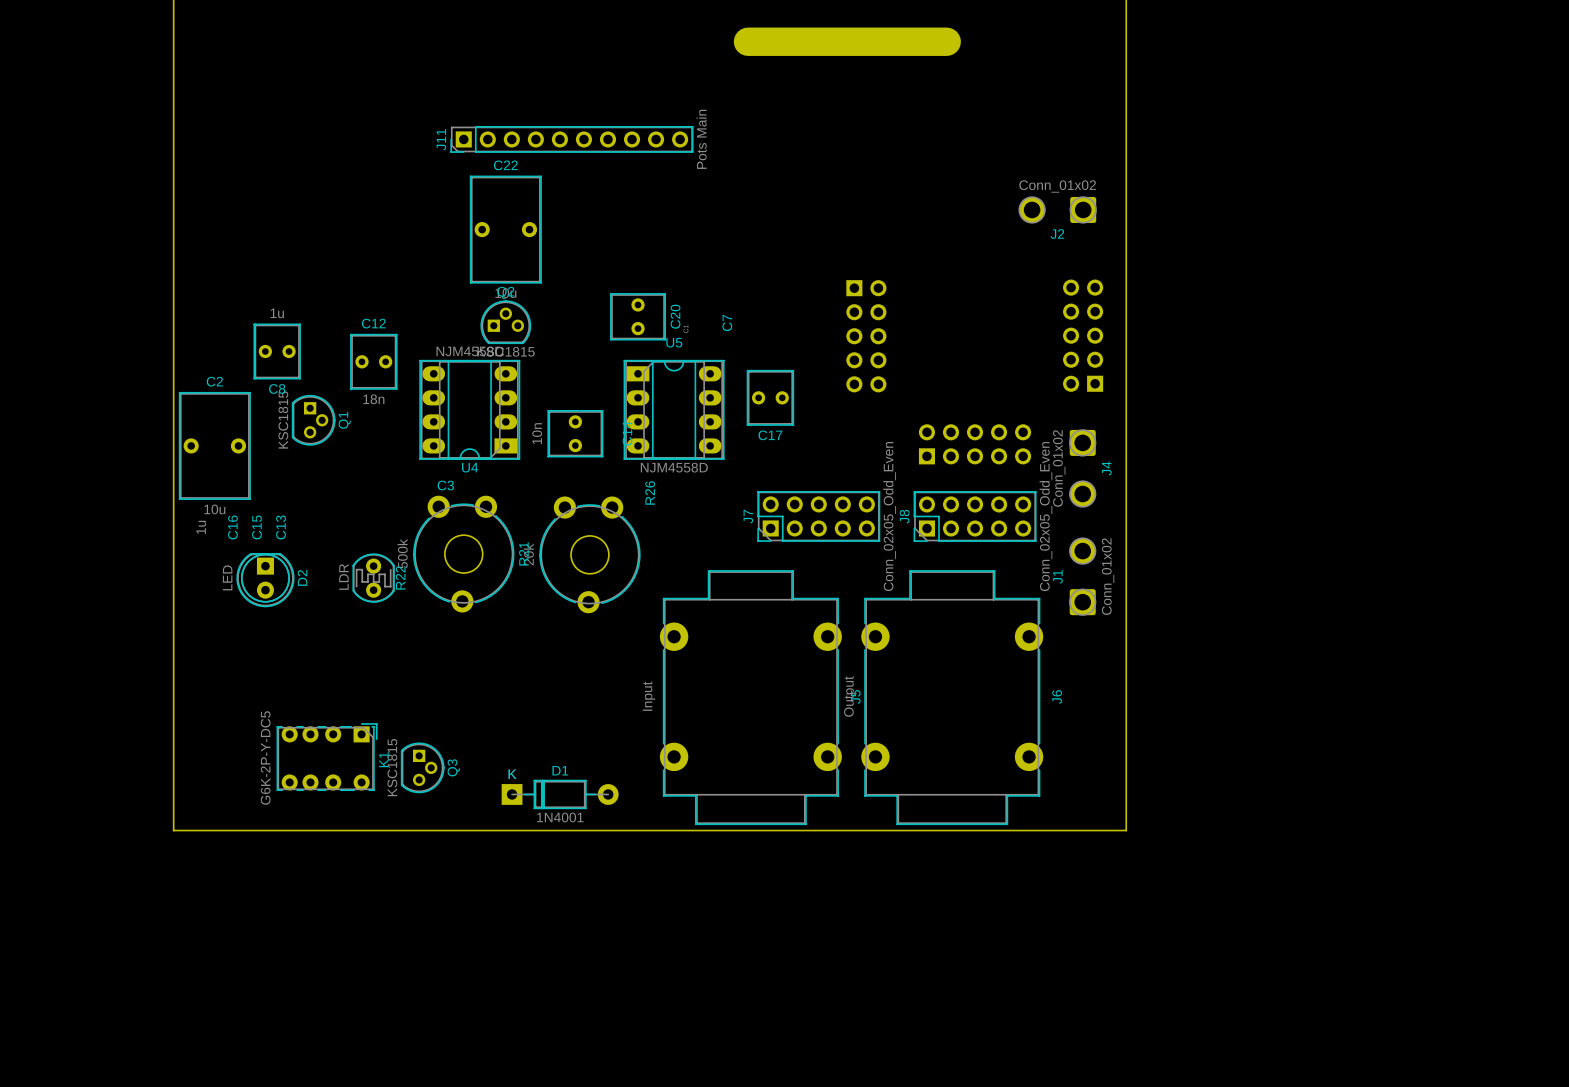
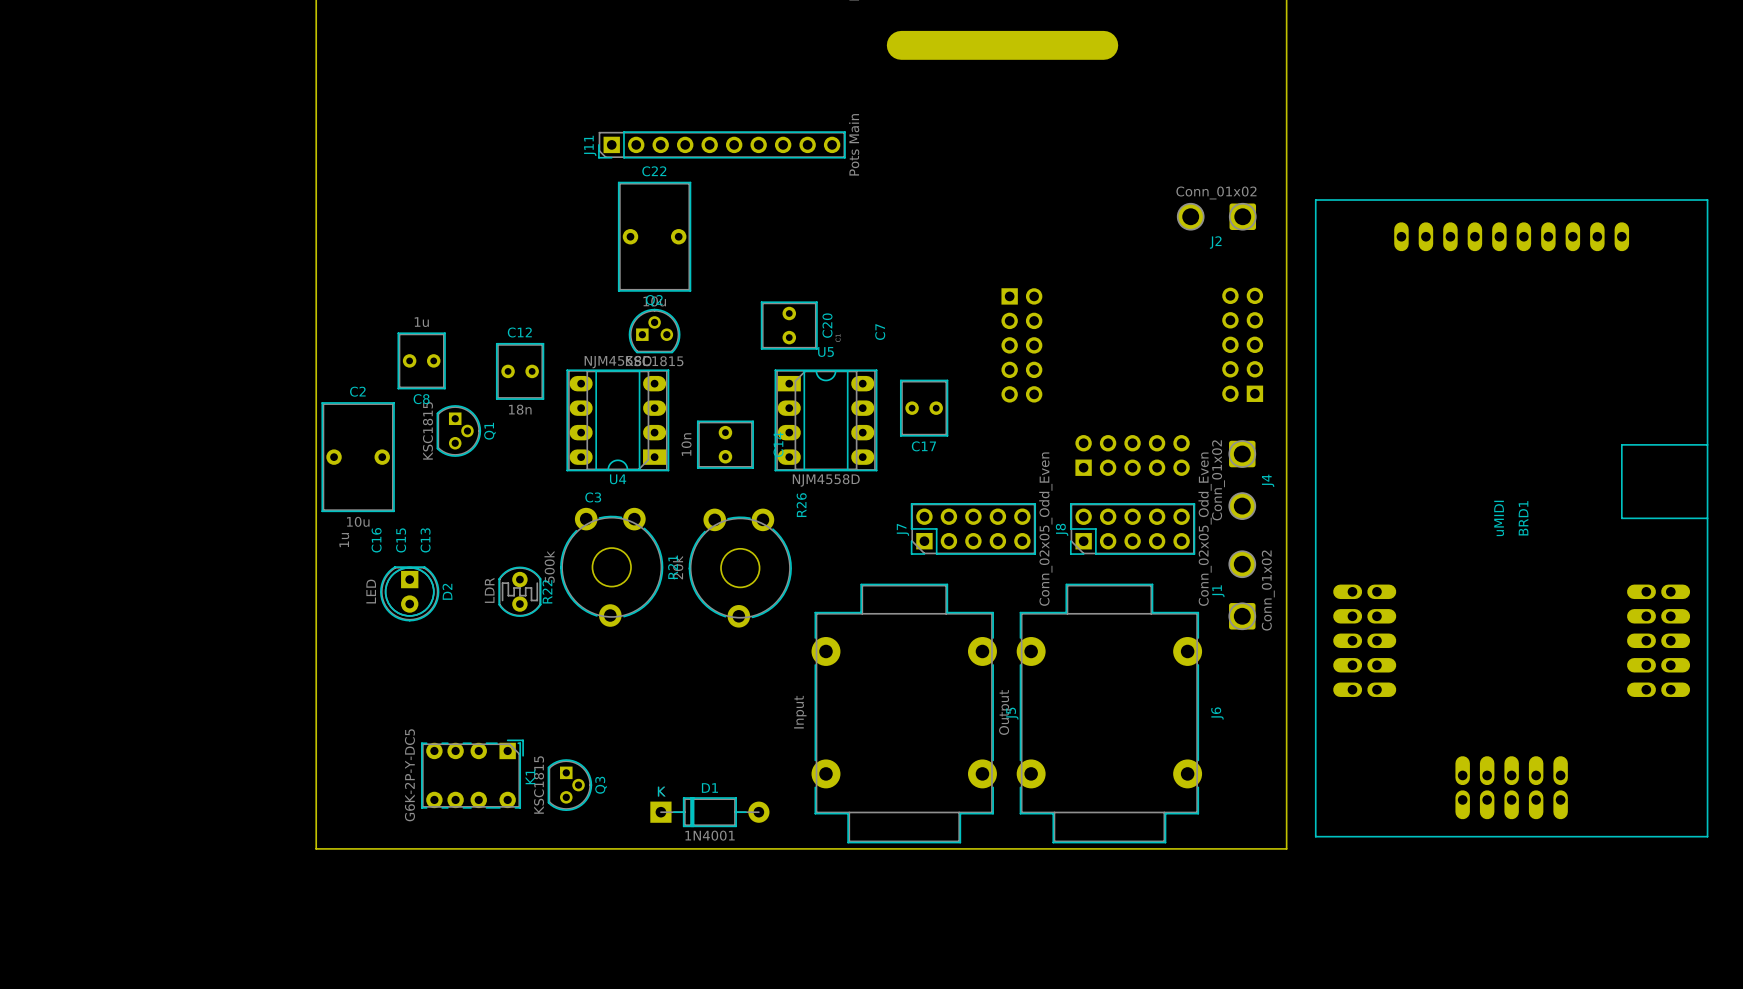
BRD1: none -> uMIDI (1511, 518)

